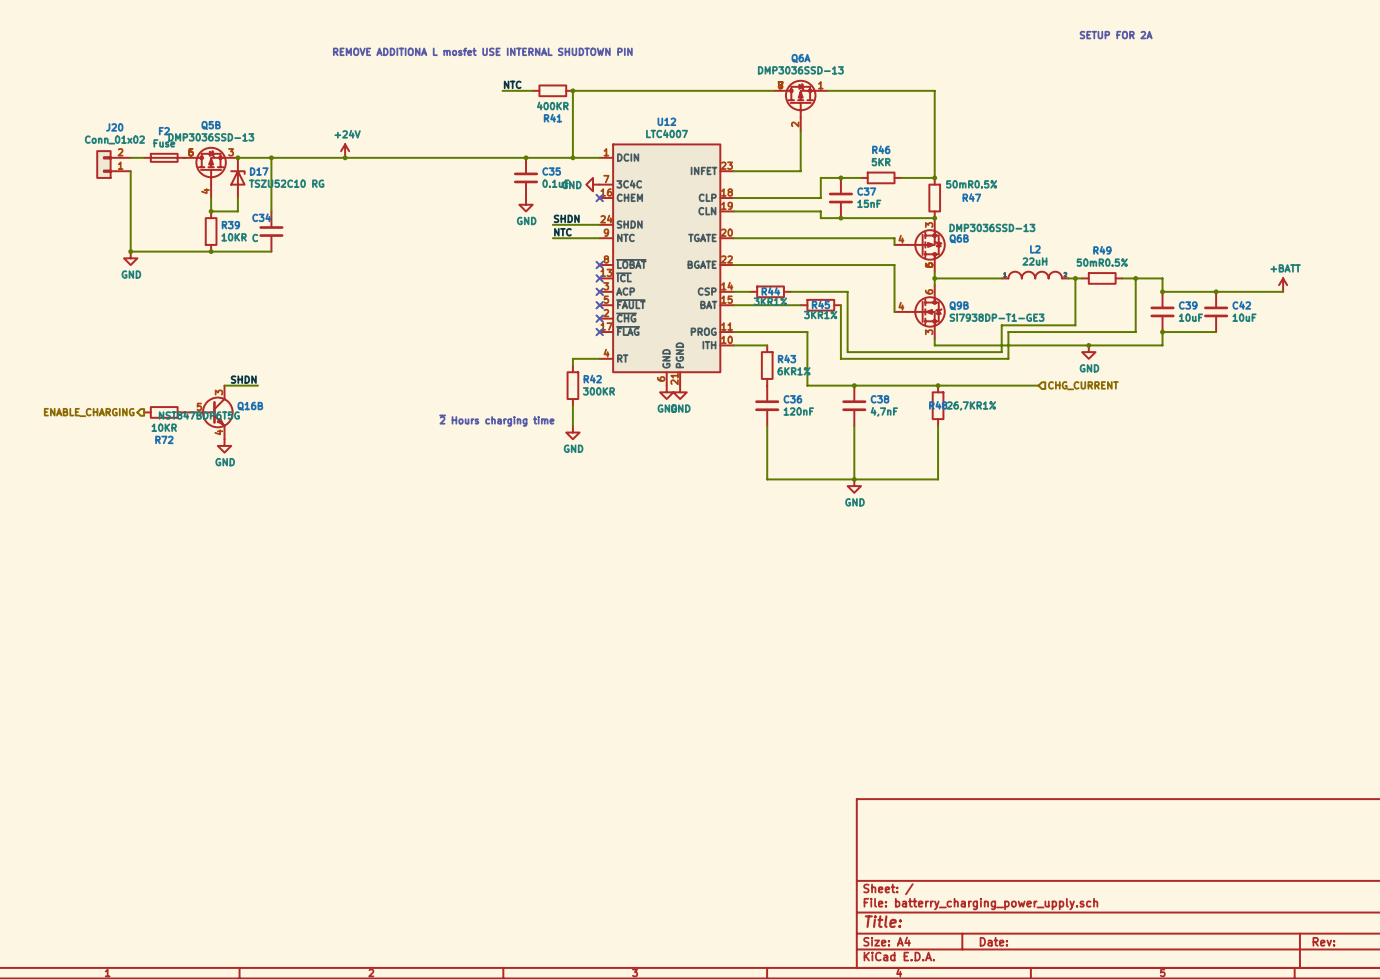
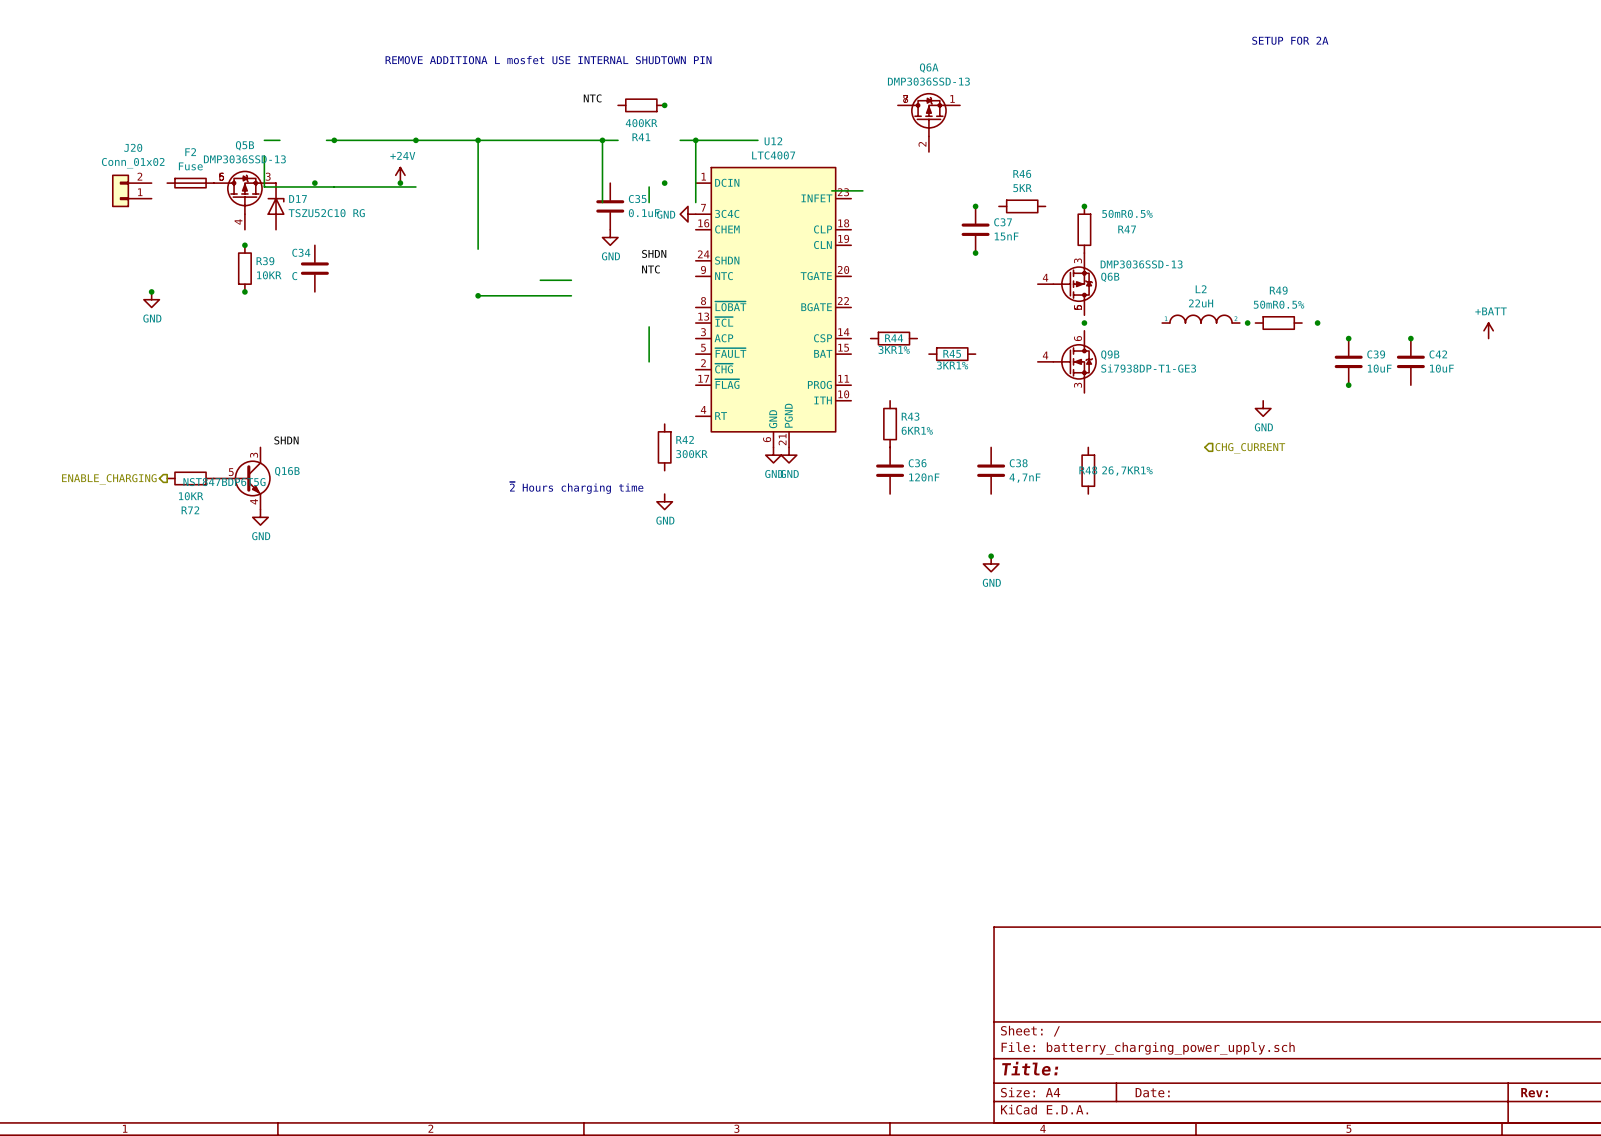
wire: (502, 90) (532, 90) -> none
wire: (773, 90) (572, 90) (572, 157) -> none
wire: (827, 90) (934, 90) (934, 177) (901, 177) -> none
wire: none -> (326, 140) (618, 140)
junction: none -> (334, 140)
junction: none -> (415, 140)
wire: none -> (478, 140) (478, 249)
junction: none -> (478, 140)
wire: none -> (602, 140) (602, 202)
junction: none -> (602, 140)
wire: none -> (680, 140) (757, 140)
wire: none -> (695, 140) (695, 202)
junction: none -> (695, 140)
wire: (800, 131) (800, 171) (733, 171) -> none
wire: none -> (264, 155) (264, 186) (415, 186)
wire: (130, 157) (144, 157) -> (264, 140) (279, 140)
wire: (237, 157) (599, 157) -> none
junction: (237, 157) -> none
wire: (271, 157) (271, 211) -> none
junction: (526, 157) -> none
wire: none -> (649, 186) (649, 202)
wire: none -> (831, 190) (862, 190)
wire: (130, 171) (130, 251) (271, 251) -> none
wire: (861, 177) (820, 177) (820, 198) (733, 198) -> none
wire: (211, 198) (211, 211) (237, 211) (237, 198) -> none
no-connect mark: (599, 198) -> none
wire: (733, 211) (820, 211) (820, 218) (934, 218) -> none
junction: (934, 218) -> none
wire: (552, 224) (599, 224) -> none
wire: (552, 238) (599, 238) -> none
wire: (733, 238) (894, 238) (894, 244) -> none
wire: none -> (540, 280) (571, 280)
wire: none -> (478, 295) (571, 295)
junction: none -> (478, 295)
no-connect mark: (599, 265) -> none
wire: (733, 265) (894, 265) (894, 311) -> none
wire: (934, 271) (934, 285) -> none
no-connect mark: (599, 278) -> none
wire: (934, 278) (1001, 278) -> none
wire: (1068, 278) (1082, 278) -> none
wire: (1075, 278) (1075, 325) (1001, 325) (1001, 352) (847, 352) (847, 291) (790, 291) -> none
wire: (1122, 278) (1162, 278) (1162, 291) (1283, 291) -> none
wire: (1135, 278) (1135, 332) (1008, 332) (1008, 358) (840, 358) (840, 305) -> none
wire: none -> (649, 326) (649, 361)
no-connect mark: (599, 291) -> none
wire: (733, 291) (750, 291) -> none
no-connect mark: (599, 305) -> none
wire: (733, 305) (800, 305) -> none
no-connect mark: (599, 318) -> none
no-connect mark: (599, 332) -> none
wire: (733, 332) (807, 332) (807, 385) (1038, 385) -> none
wire: (1216, 332) (1162, 332) (1162, 345) (934, 345) (934, 338) -> none
wire: (733, 345) (767, 345) -> none
junction: (1088, 345) -> none
wire: (599, 358) (572, 358) (572, 365) -> none
wire: (224, 385) (258, 385) -> none
junction: (854, 385) -> none
junction: (938, 385) -> none
wire: (572, 405) (572, 425) -> none
wire: (767, 425) (767, 479) (938, 479) (938, 425) -> none
wire: (854, 425) (854, 479) -> none

